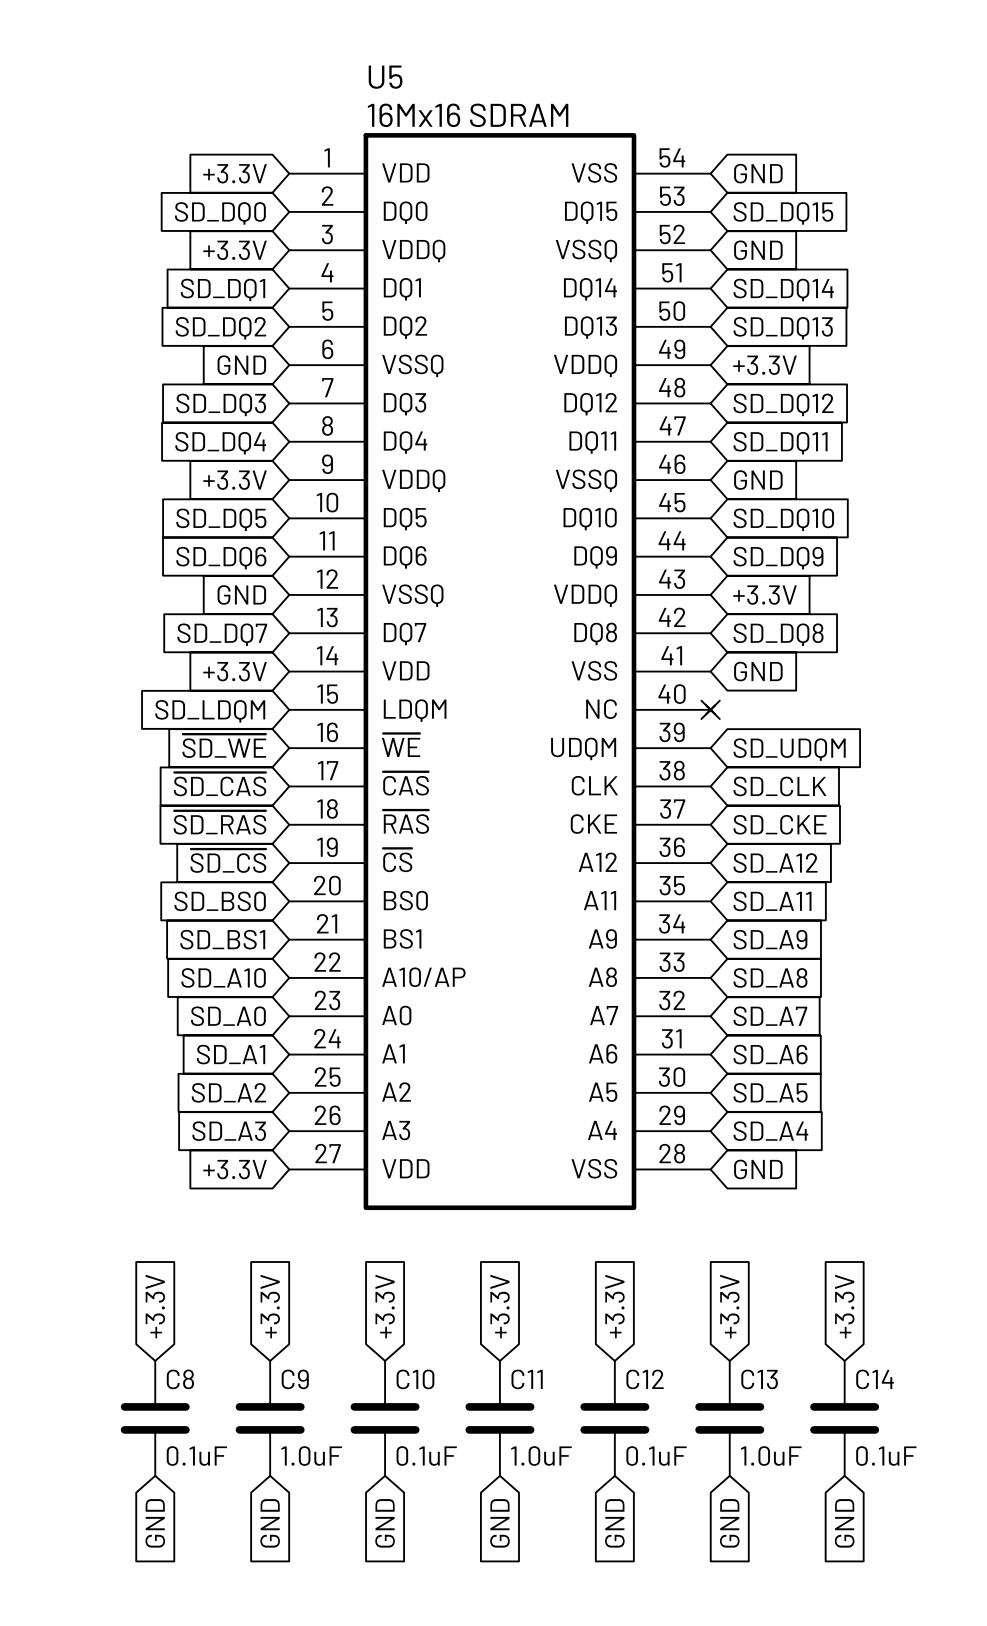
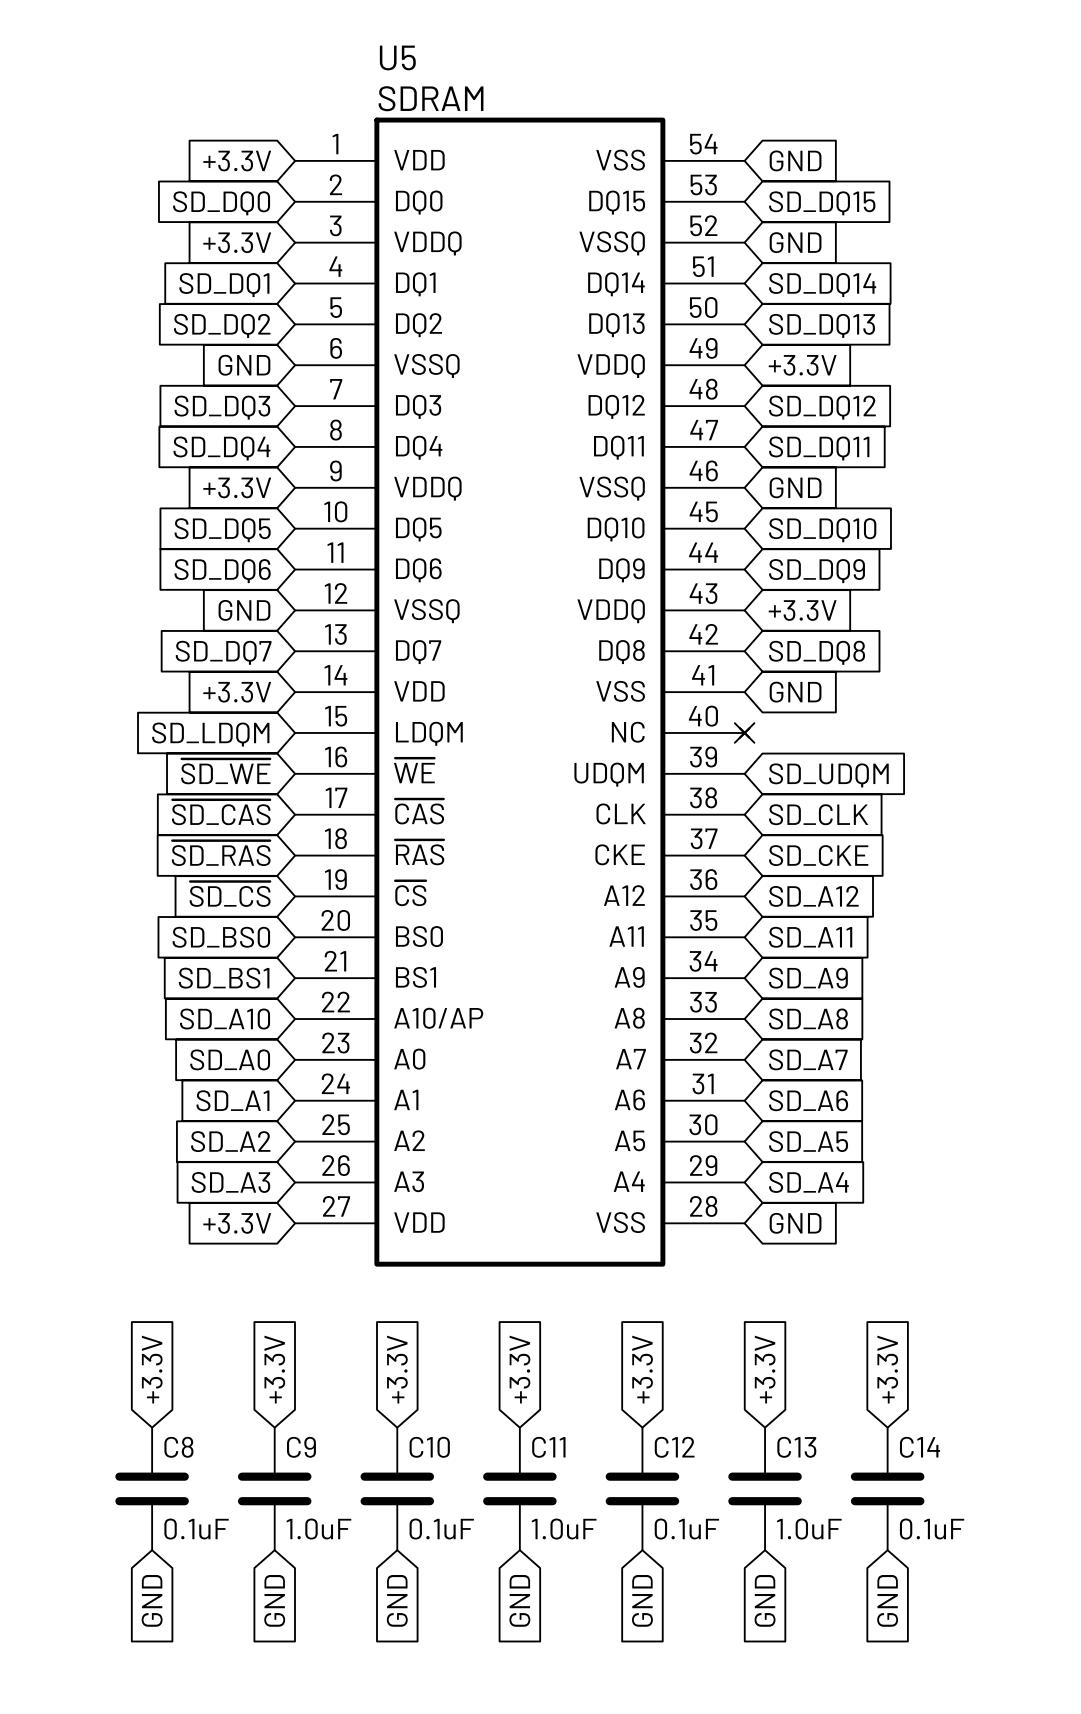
U5 value: 16Mx16 SDRAM (468, 115) -> SDRAM (431, 98)

